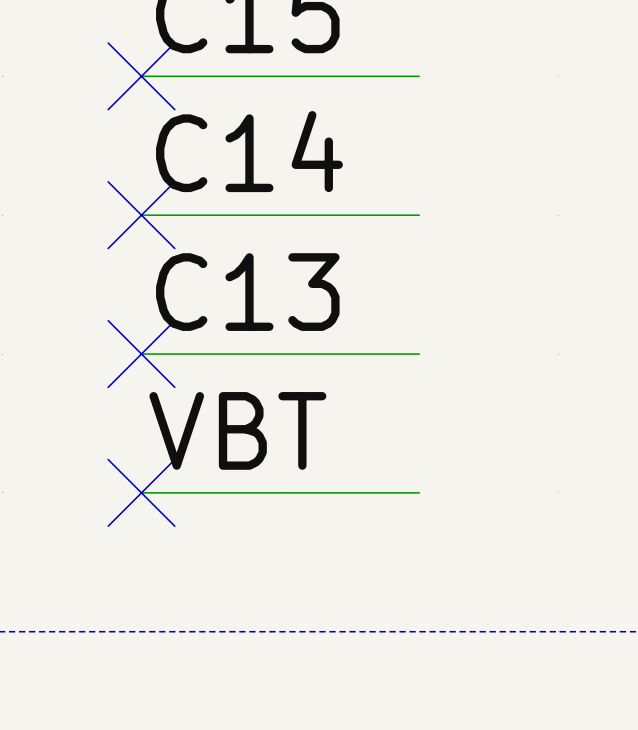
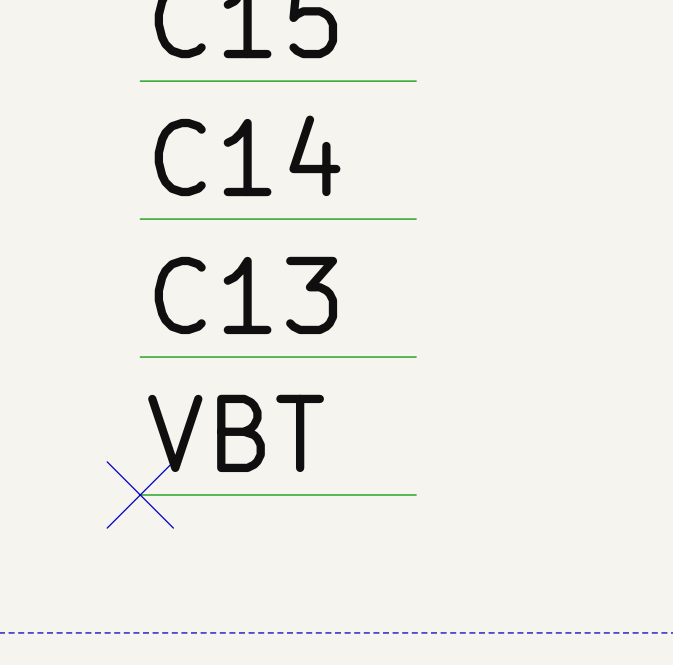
no-connect mark: (141, 76) -> none
no-connect mark: (141, 215) -> none
no-connect mark: (141, 354) -> none

